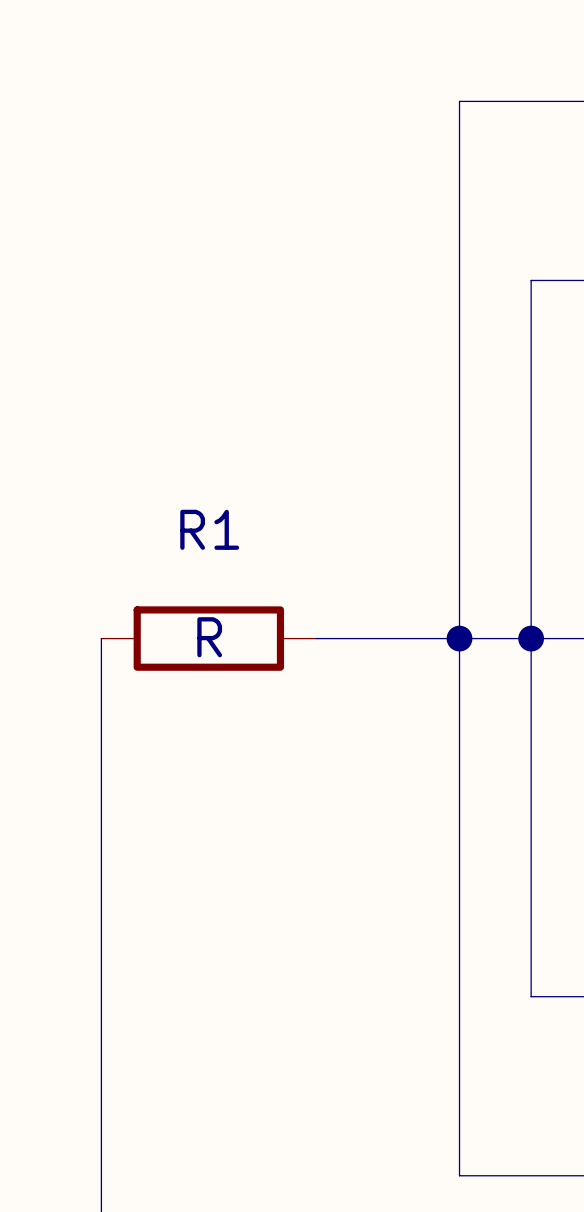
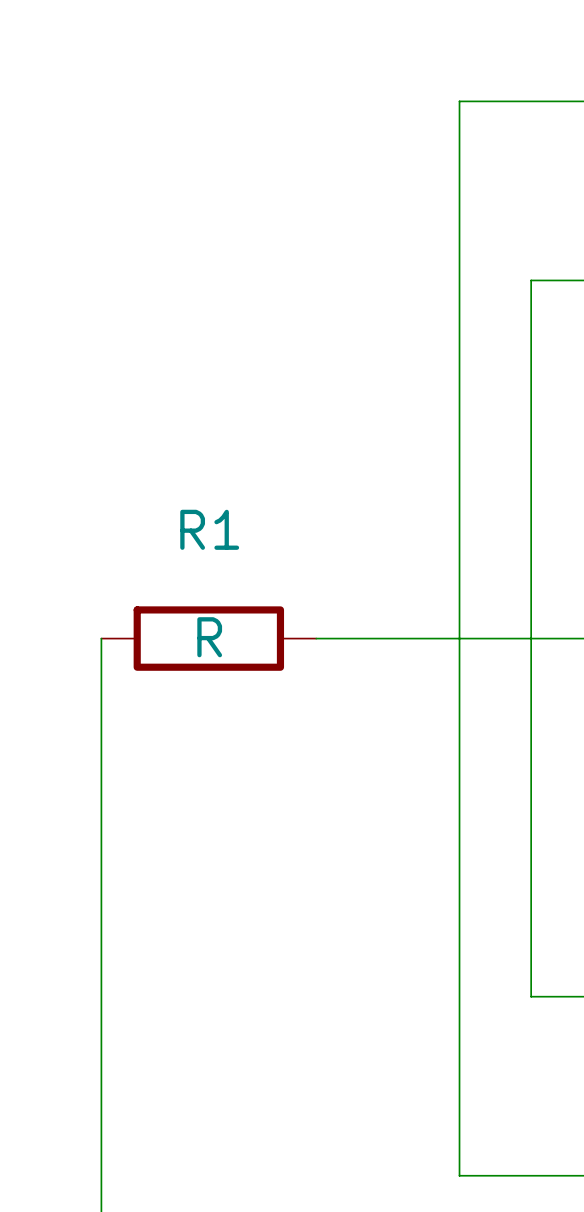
junction: (459, 638) -> none
junction: (531, 638) -> none

